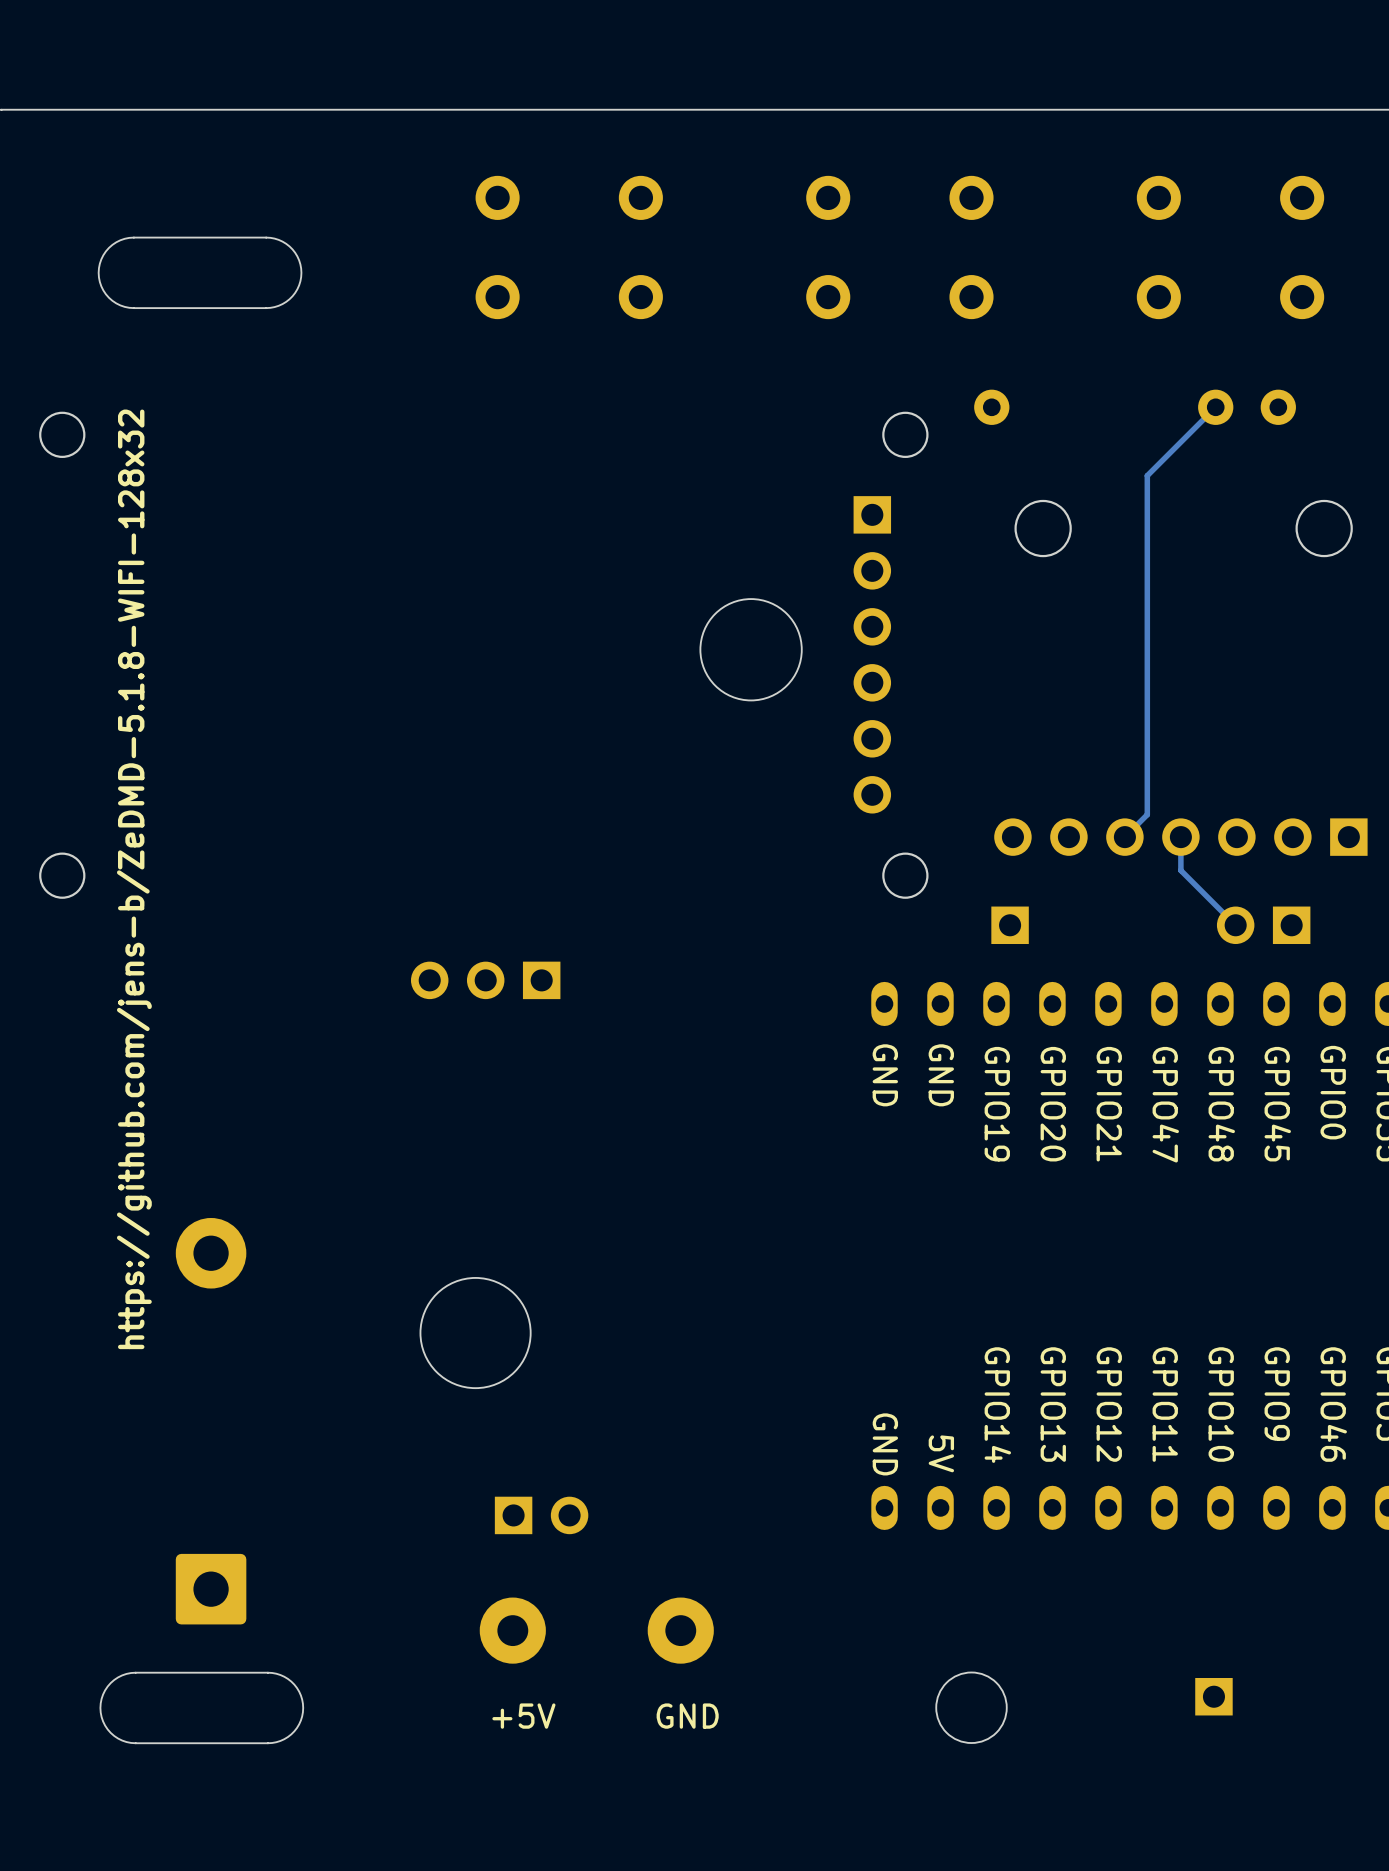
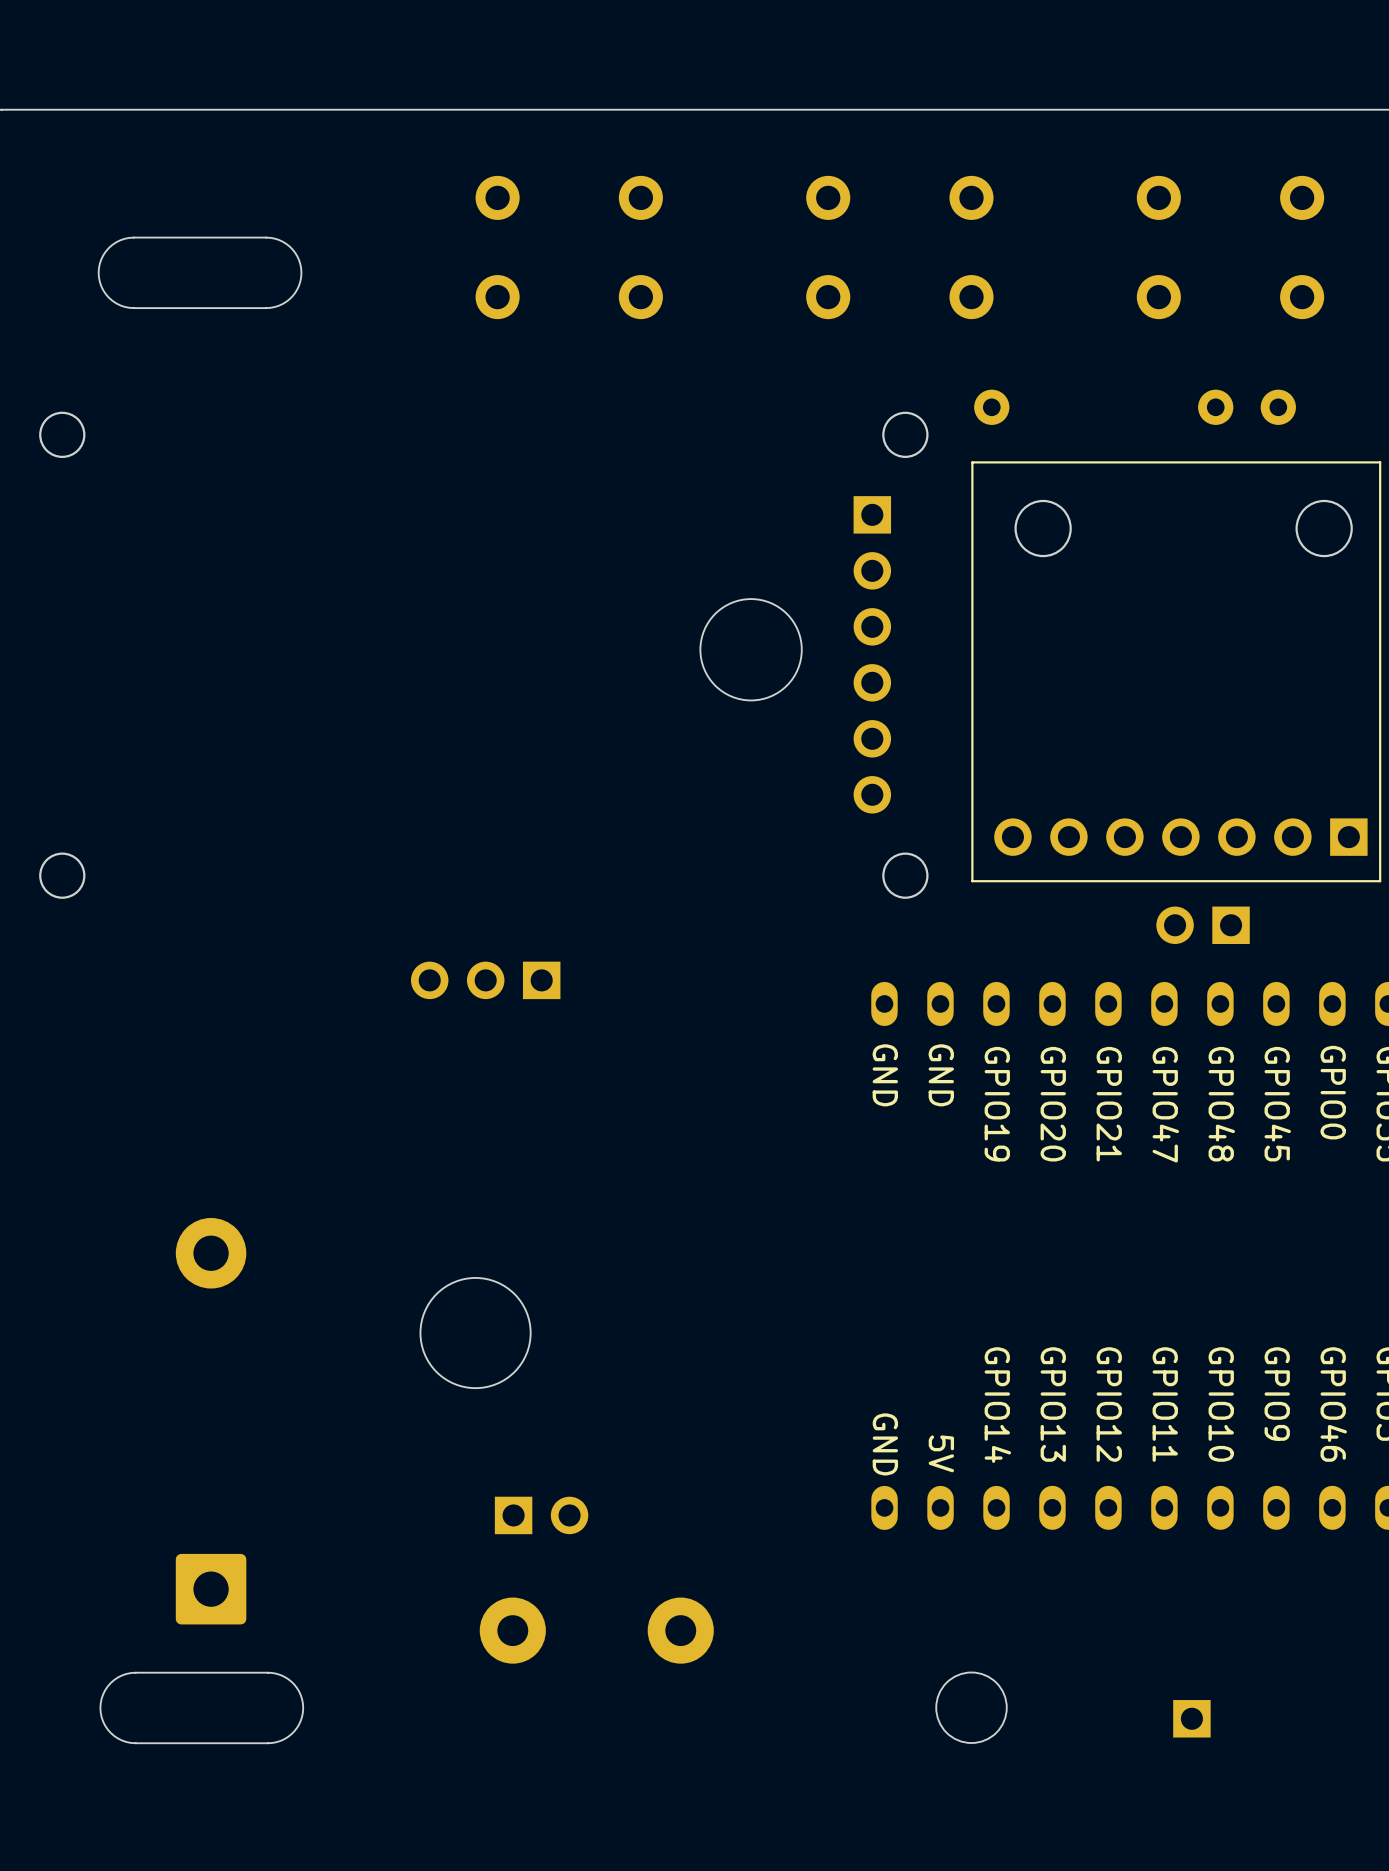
track: (1215, 407) (1147, 475) (1147, 814) (1124, 837) -> none
line: none -> (1380, 462) (972, 462) (972, 881) (1380, 881) (1380, 462)
track: (1180, 837) (1180, 870) (1235, 925) -> none
text: https://github.com/jens-b/ZeDMD-5.1.8-WIFI-128x32 (134, 879) -> none
part: (1010, 925) -> none
part position: (1263, 925) -> (1203, 925)
part position: (1213, 1696) -> (1191, 1718)
text: +5V (523, 1716) -> none
text: GND (687, 1716) -> none

